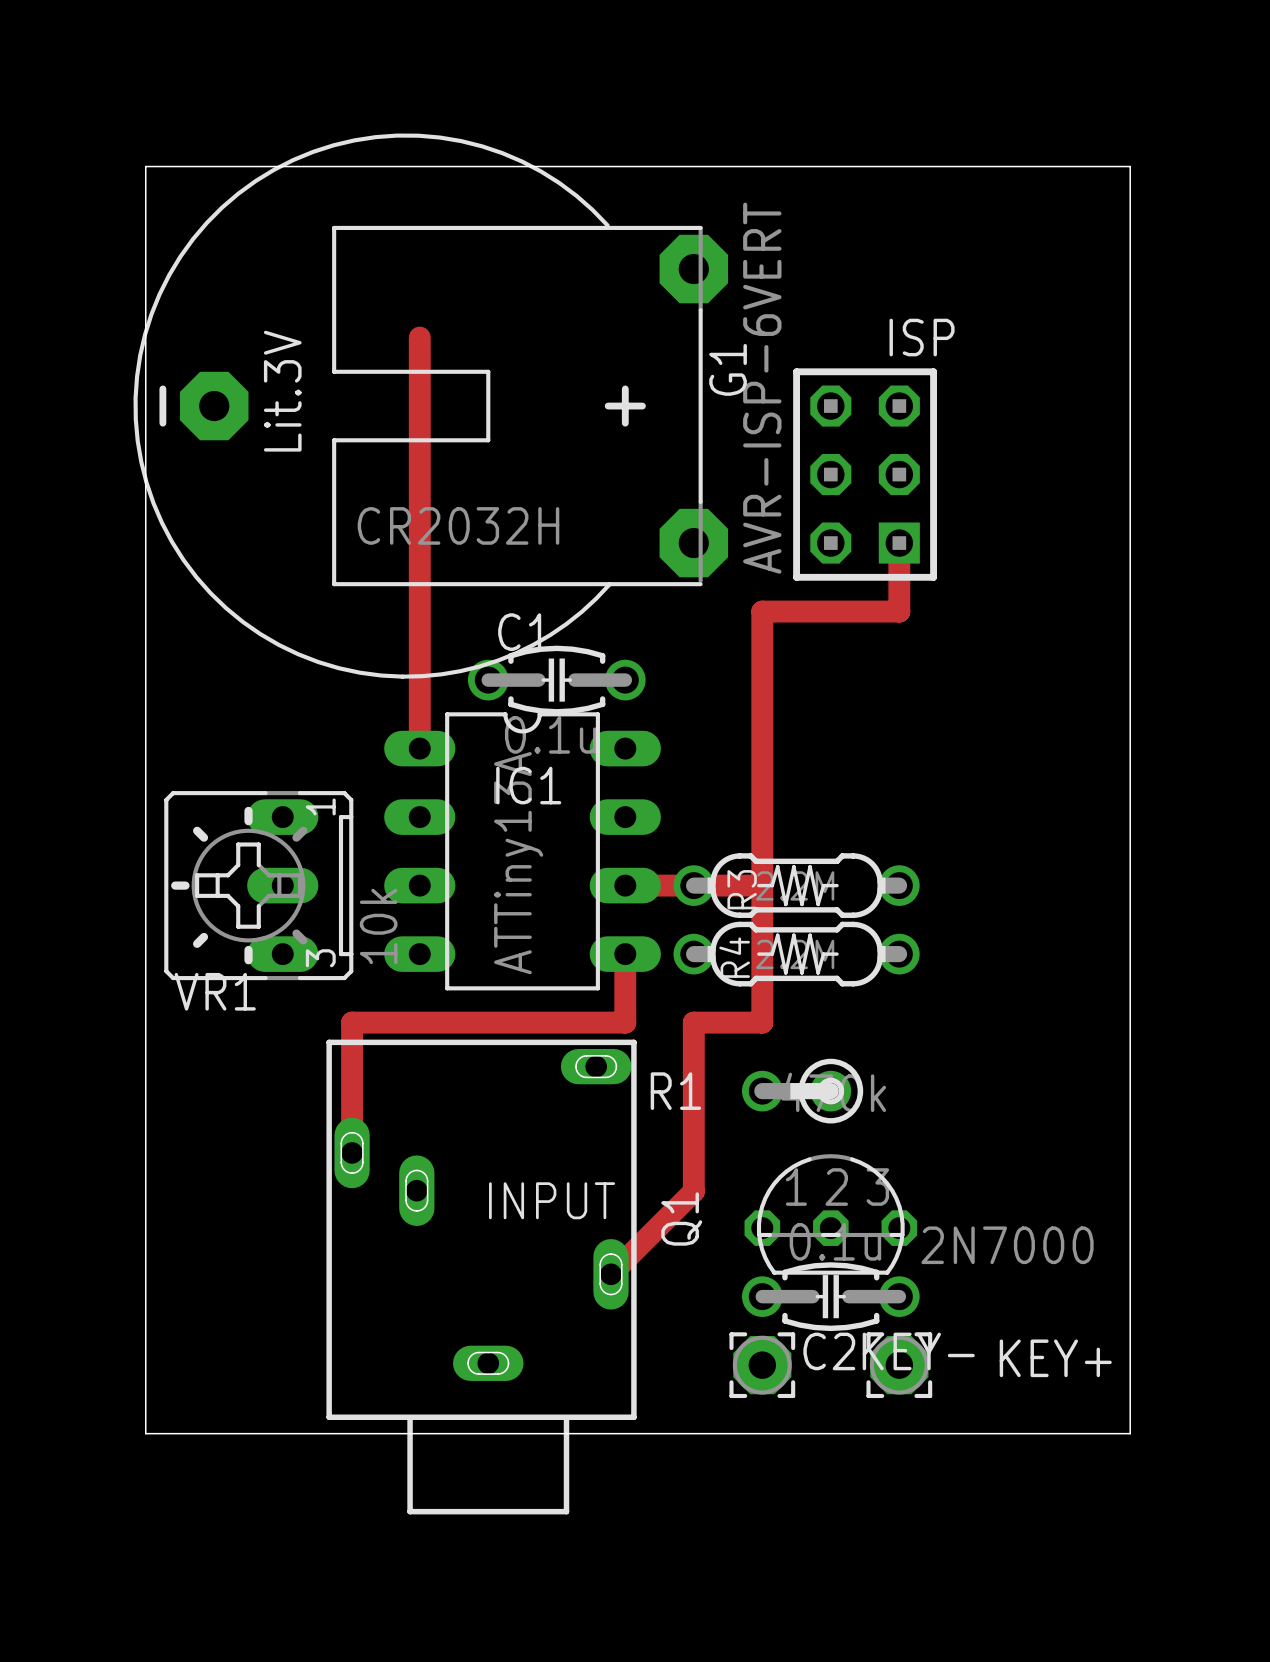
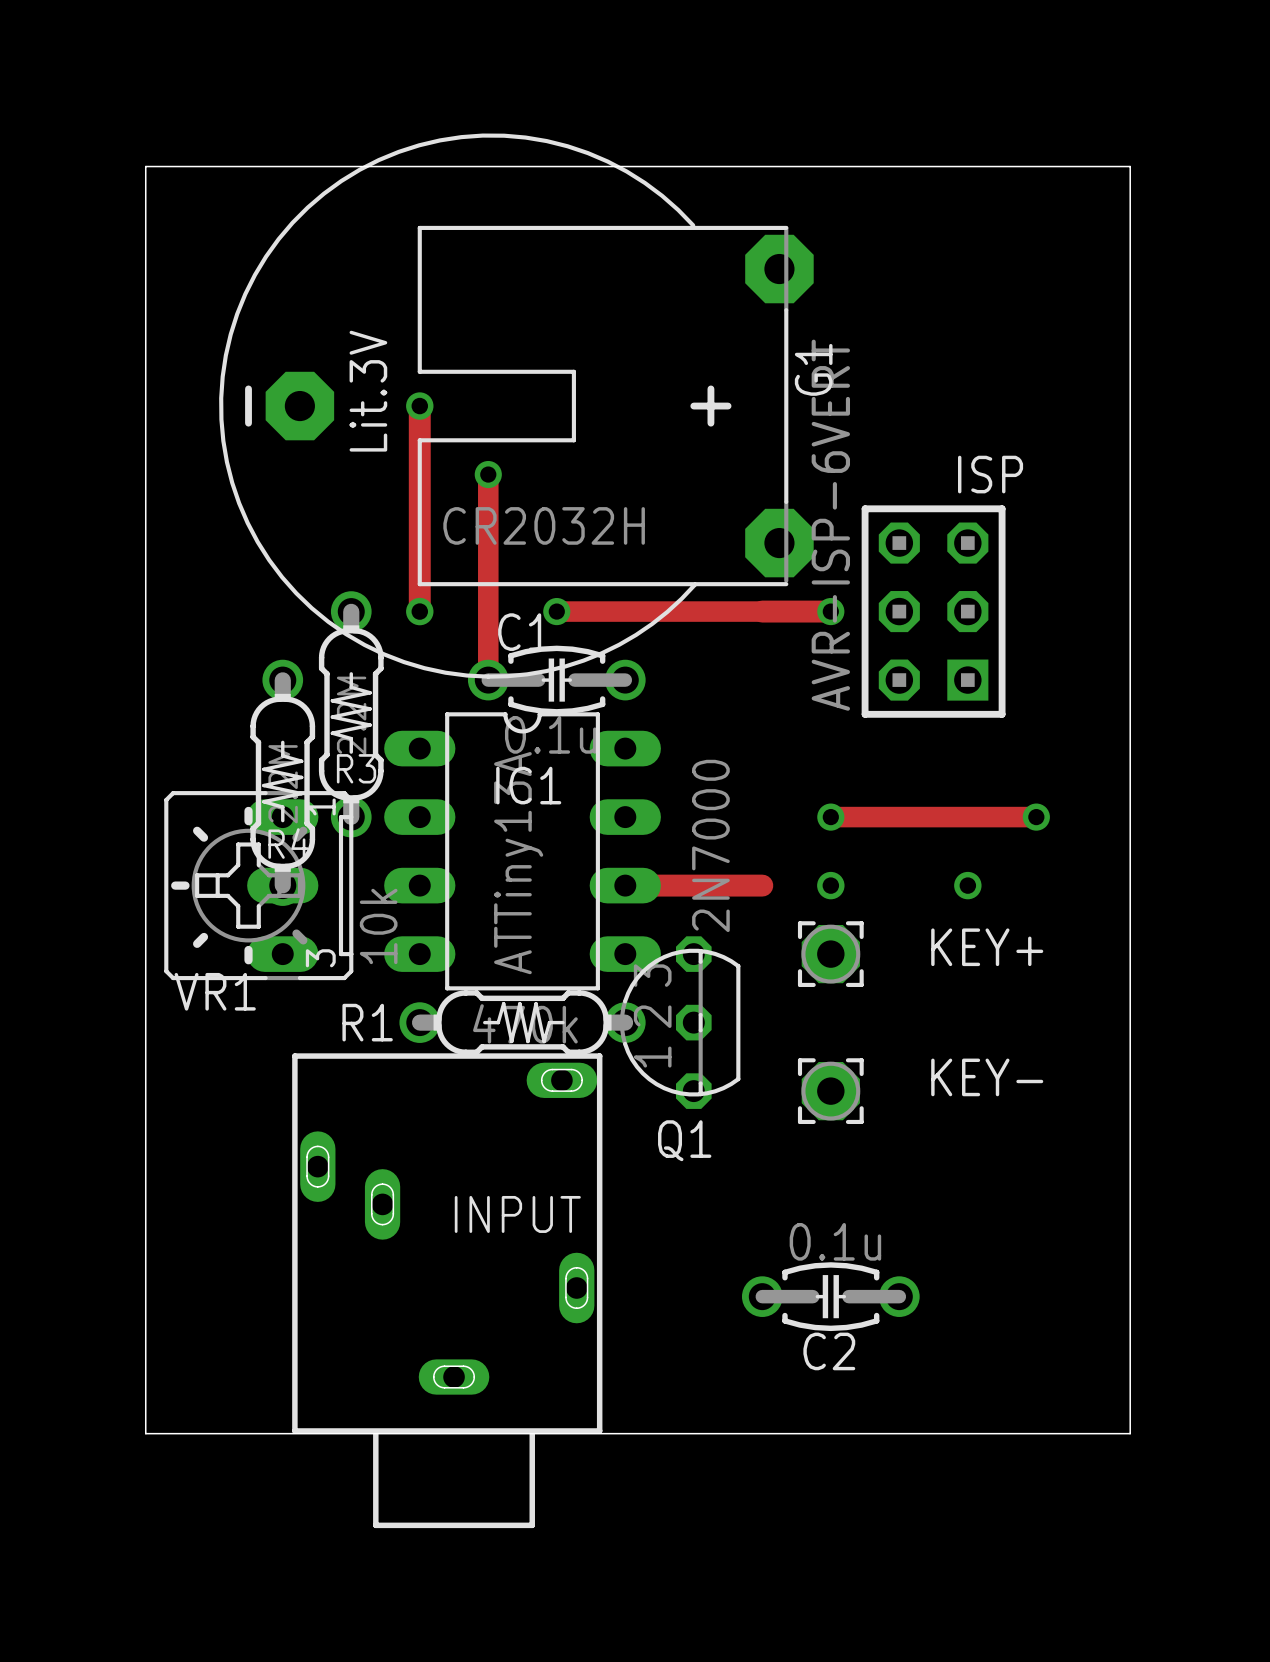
track: (419, 337) (419, 406) -> none
via: none -> (419, 406)
G1 position: (430, 406) -> (516, 406)
track: none -> (488, 474) (488, 680)
via: none -> (488, 474)
ISP position: (865, 474) -> (933, 611)
track: (899, 543) (899, 611) (830, 611) -> none
track: (419, 611) (419, 748) -> none
via: none -> (419, 611)
via: none -> (556, 611)
track: (762, 611) (762, 1022) (693, 1022) (693, 1191) (611, 1274) -> (762, 611) (556, 611)
via: none -> (830, 611)
track: none -> (830, 817) (1036, 817)
via: none -> (830, 817)
via: none -> (1036, 817)
R3 rotation: 0° (796, 885) -> 90° counterclockwise (351, 714)
R3 position: (796, 885) -> (351, 714)
via: none -> (830, 885)
via: none -> (967, 885)
track: (625, 954) (625, 1022) (352, 1022) (351, 1152) -> none
R4 rotation: 0° (796, 954) -> 90° counterclockwise (282, 782)
R4 position: (796, 954) -> (282, 782)
R1 footprint: [741, 1058, 864, 1124] -> [399, 990, 646, 1055]
Q1 rotation: 0° (830, 1214) -> 90° counterclockwise (680, 1022)
Q1 position: (830, 1214) -> (680, 1022)
INPUT position: (481, 1277) -> (447, 1290)
KEY- position: (762, 1365) -> (830, 1091)
KEY+ position: (899, 1365) -> (830, 954)

